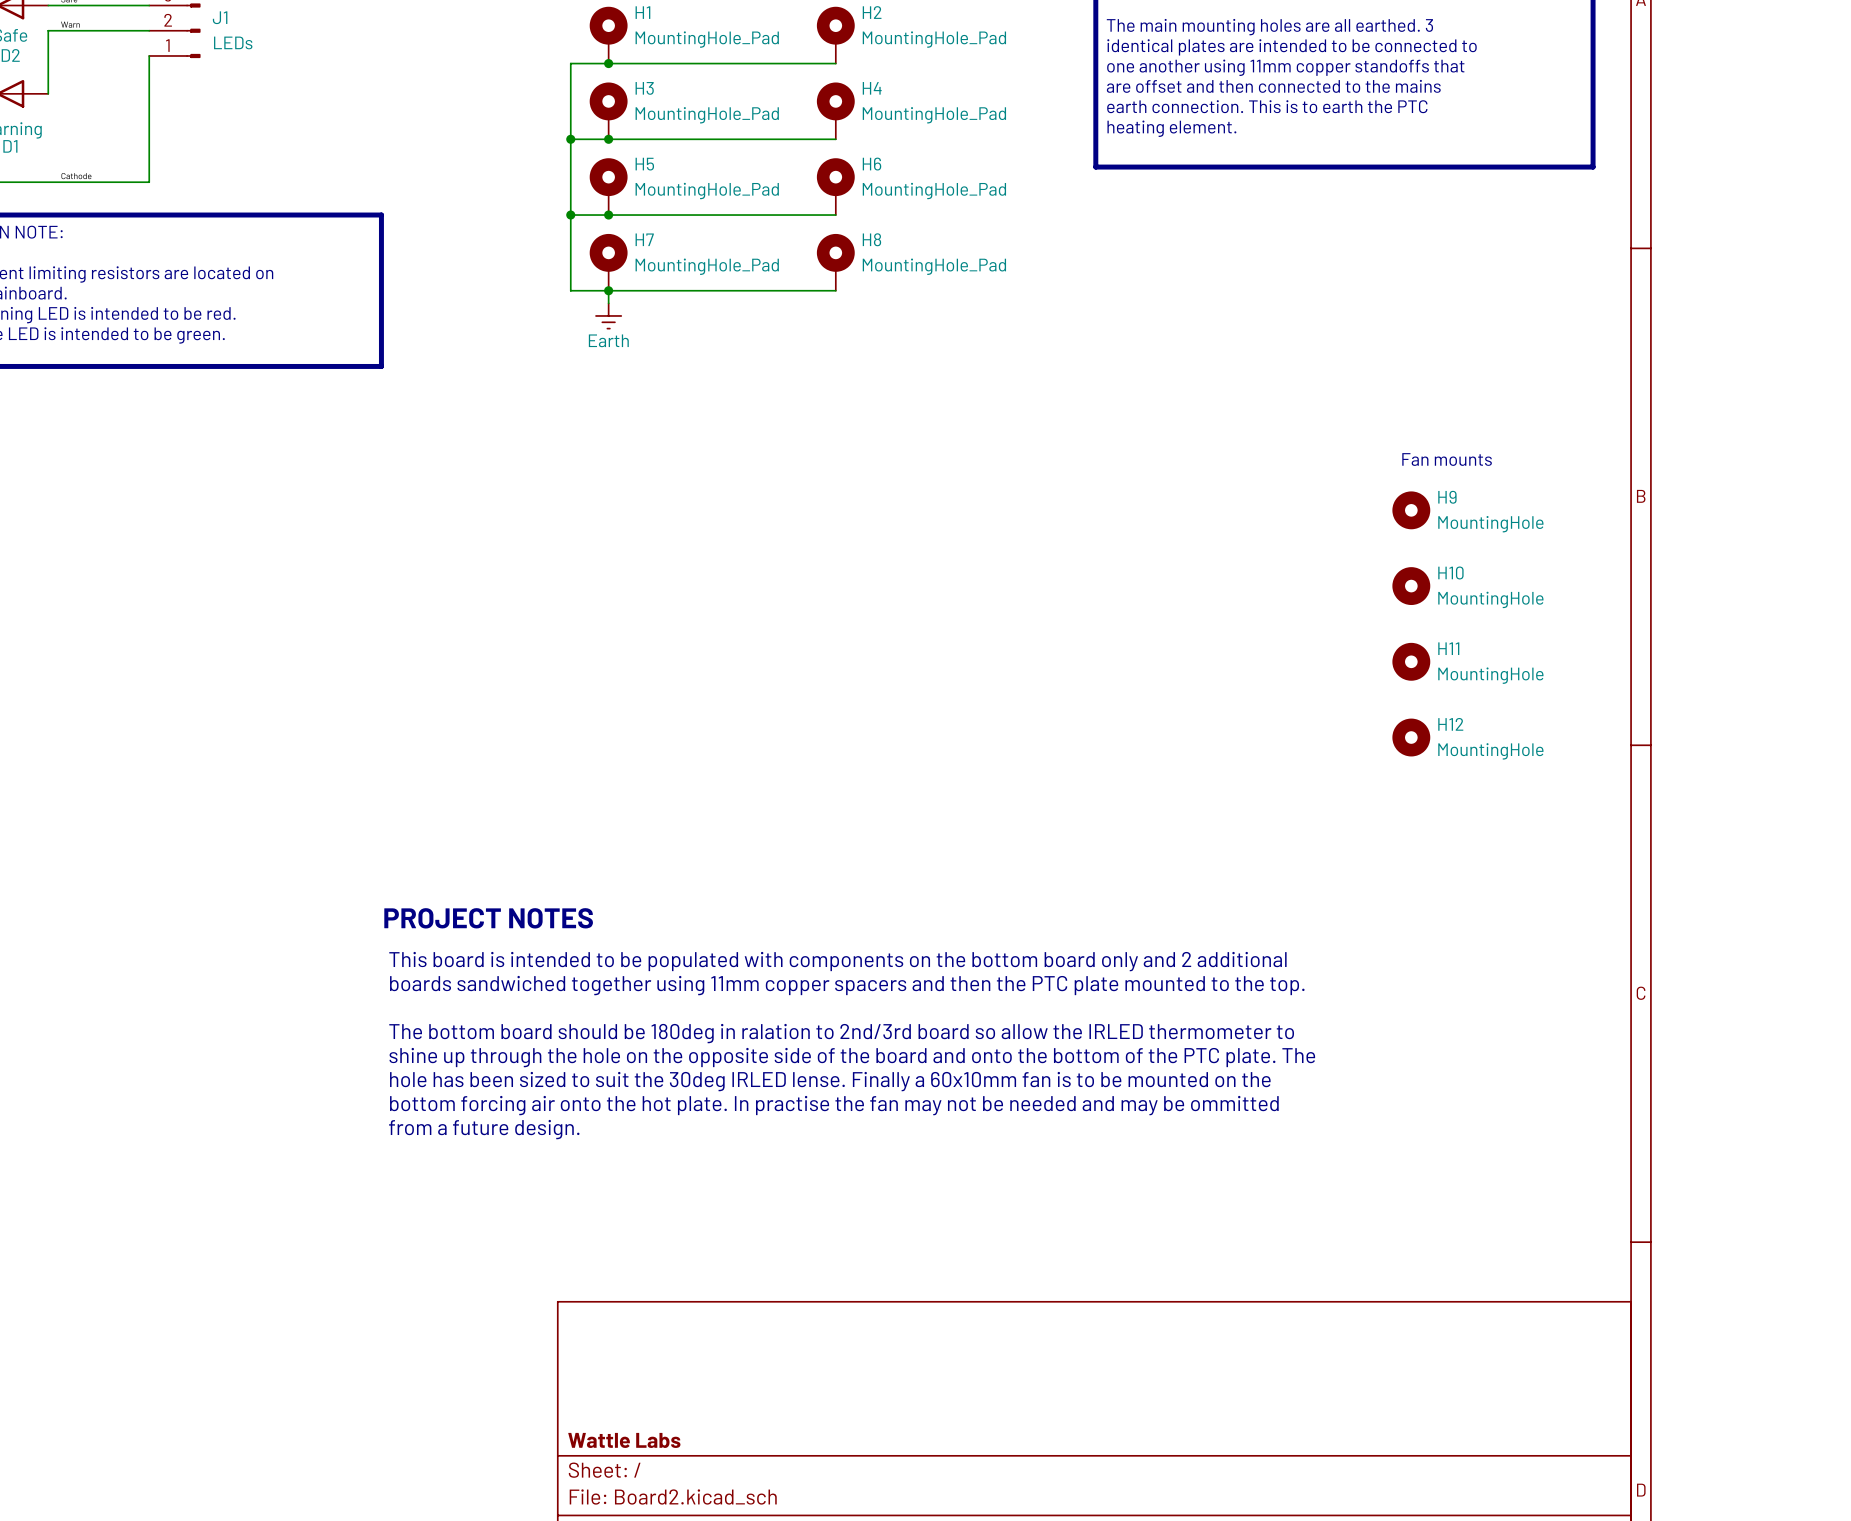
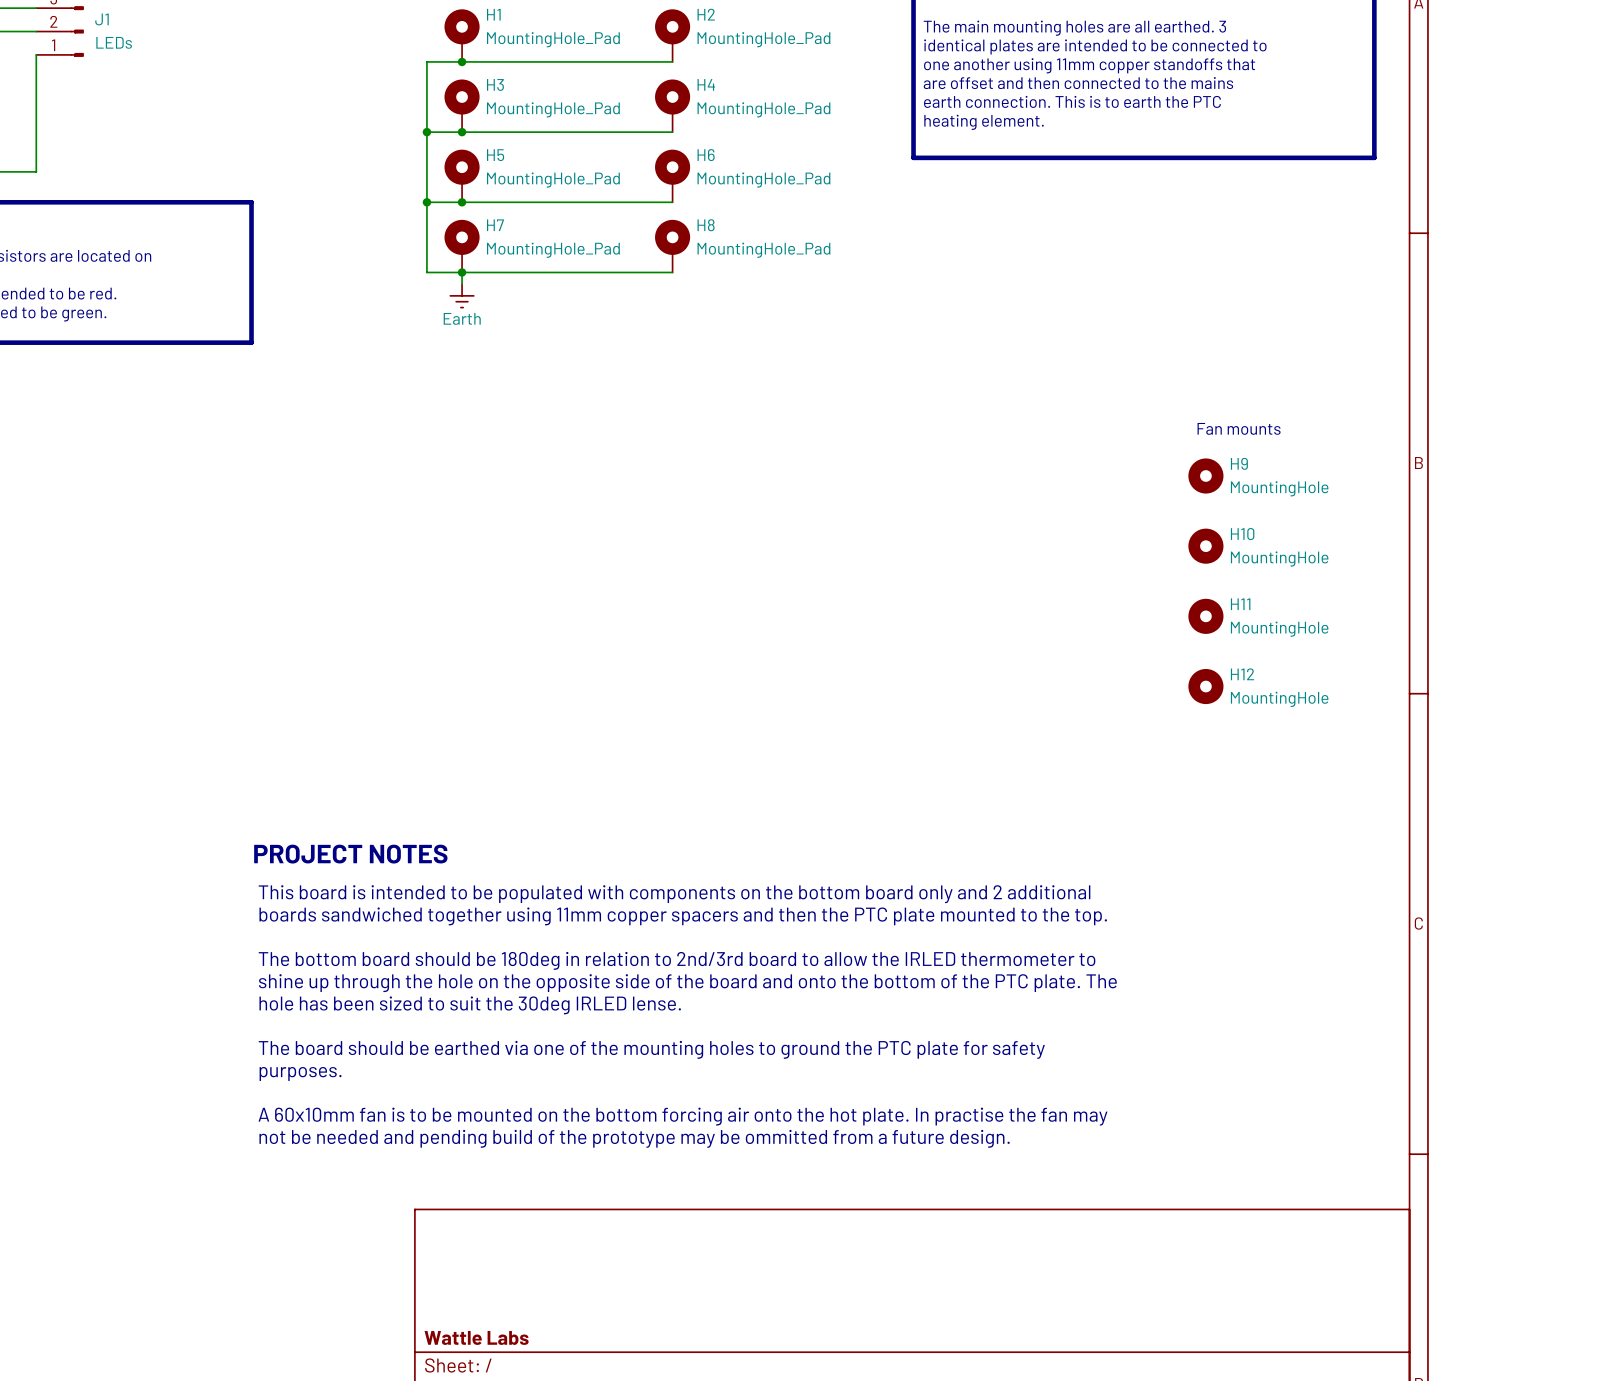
text: The bottom board should be 180deg in ralation to 2nd/3rd board so allow the IRLED thermometer to (841, 1033) -> The bottom board should be 180deg in relation to 2nd/3rd board to allow the IRLED thermometer to (677, 960)
text: hole has been sized to suit the 30deg IRLED lense. Finally a 60x10mm fan is to be mounted on the (830, 1081) -> hole has been sized to suit the 30deg IRLED lense. (470, 1005)
text: bottom forcing air onto the hot plate. In practise the fan may not be needed and may be ommitted (834, 1105) -> none
text: from a future design. (484, 1129) -> The board should be earthed via one of the mounting holes to ground the PTC plate for safety (651, 1049)
text: none -> purposes. (300, 1073)
text: none -> A 60x10mm fan is to be mounted on the bottom forcing air onto the hot plate. In practise the fan may (683, 1116)
text: none -> not be needed and pending build of the prototype may be ommitted from a future design. (634, 1138)

